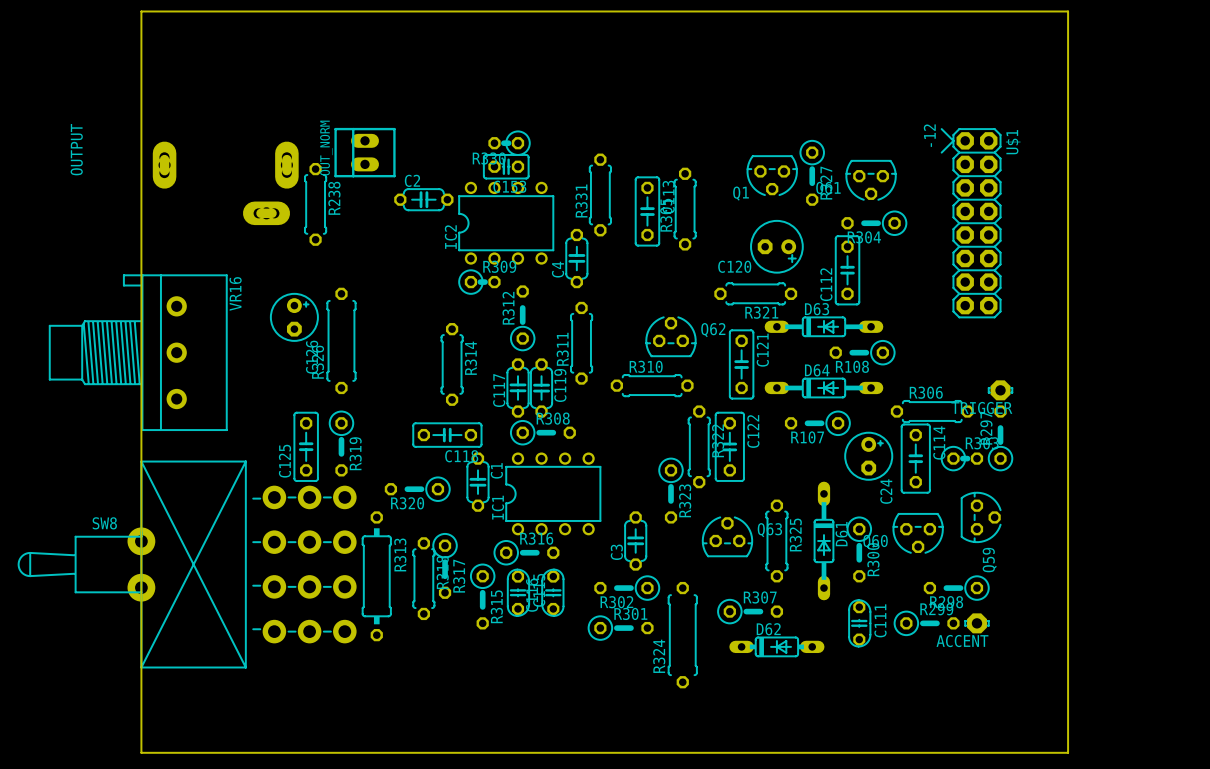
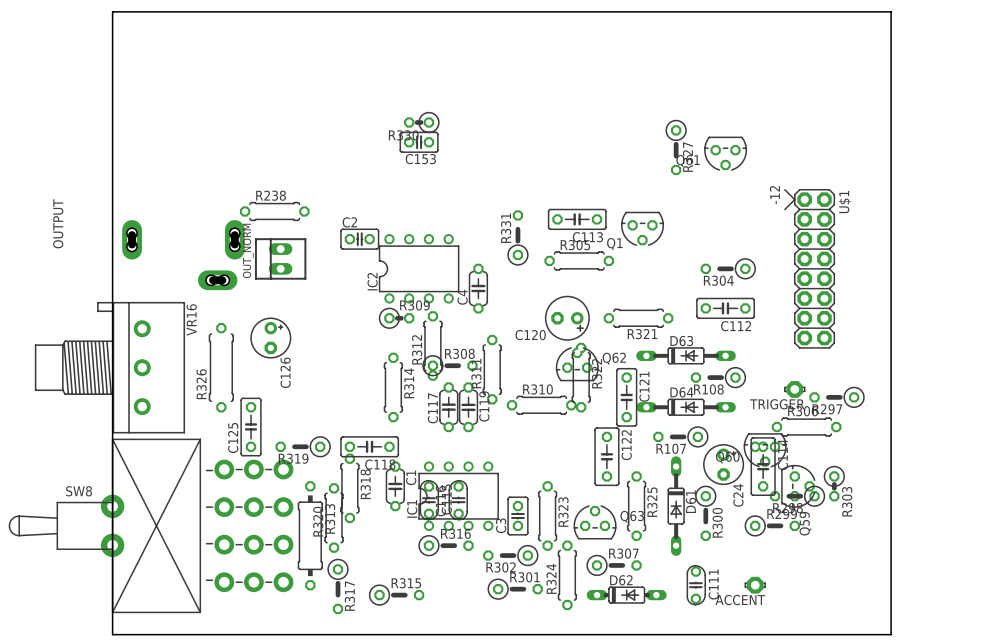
OUT_NORM position: (365, 152) -> (280, 258)
R331 footprint: [589, 153, 612, 237] -> [507, 210, 529, 266]
Q1 position: (772, 175) -> (642, 228)
OUTPUT position: (225, 183) -> (183, 255)
C2 footprint: [394, 188, 454, 211] -> [340, 228, 380, 250]
R238 name position: R238 (334, 198) -> R238 (271, 195)
R238 rotation: 0° (315, 204) -> 90° clockwise (274, 211)
R305 rotation: 0° (685, 209) -> 90° clockwise (579, 260)
R305 position: (685, 209) -> (579, 260)
C113 rotation: 0° (647, 211) -> 90° clockwise (577, 219)
C113 position: (647, 211) -> (577, 219)
IC2 position: (506, 223) -> (419, 268)
R304 position: (874, 223) -> (728, 268)
U$1 position: (971, 223) -> (809, 268)
C120 position: (776, 246) -> (567, 318)
C4 position: (576, 258) -> (478, 288)
C112 rotation: 0° (847, 270) -> 90° counterclockwise (725, 308)
C112 position: (847, 270) -> (725, 308)
R309 position: (479, 282) -> (396, 318)
R312 footprint: [510, 285, 535, 351] -> [423, 311, 443, 381]
R321 position: (755, 293) -> (638, 318)
C126 position: (294, 317) -> (270, 338)
D63 position: (823, 326) -> (686, 355)
Q62 position: (670, 336) -> (577, 364)
R326 position: (341, 340) -> (221, 367)
R311 position: (581, 343) -> (492, 369)
VR16 position: (138, 352) -> (109, 367)
R108 position: (862, 352) -> (718, 377)
R314 position: (452, 364) -> (393, 387)
C121 position: (741, 364) -> (626, 397)
R310 position: (652, 385) -> (541, 405)
C117 position: (518, 387) -> (448, 407)
C119 position: (541, 387) -> (468, 407)
D64 position: (823, 387) -> (686, 407)
TRIGGER position: (1000, 390) -> (794, 389)
R306 position: (932, 411) -> (806, 427)
R107 position: (817, 423) -> (680, 436)
C118 position: (447, 435) -> (369, 446)
R297 rotation: 0° (1000, 438) -> 90° counterclockwise (836, 397)
R319 rotation: 0° (341, 443) -> 90° clockwise (303, 446)
R319 position: (341, 443) -> (303, 446)
C125 position: (306, 446) -> (251, 427)
C122 position: (729, 446) -> (606, 456)
C24 position: (868, 456) -> (723, 464)
R323 footprint: [658, 458, 684, 524] -> [538, 481, 558, 551]
C114 position: (915, 458) -> (763, 466)
R303 rotation: 0° (962, 458) -> 90° clockwise (834, 483)
R303 position: (962, 458) -> (834, 483)
R320 footprint: [384, 476, 451, 502] -> [324, 483, 344, 553]
C1 position: (477, 482) -> (395, 486)
IC1 position: (553, 493) -> (458, 496)
C3 footprint: [624, 511, 647, 571] -> [507, 496, 529, 536]
Q59 position: (981, 517) -> (798, 486)
Q63 position: (727, 536) -> (595, 522)
R325 position: (776, 540) -> (636, 506)
D61 position: (823, 540) -> (676, 506)
R300 position: (859, 549) -> (705, 513)
R316 position: (526, 552) -> (446, 545)
SW8 position: (187, 564) -> (151, 525)
R317 position: (445, 566) -> (338, 586)
R313 position: (376, 576) -> (310, 535)
R324 footprint: [667, 581, 698, 689] -> [557, 540, 577, 611]
R302 position: (626, 588) -> (510, 555)
R315 rotation: 0° (482, 596) -> 90° counterclockwise (396, 595)
R315 position: (482, 596) -> (396, 595)
R307 position: (750, 611) -> (614, 565)
C111 position: (859, 623) -> (696, 585)
ACCENT position: (976, 623) -> (755, 585)
R301 position: (620, 628) -> (515, 589)
D62 position: (776, 646) -> (626, 595)

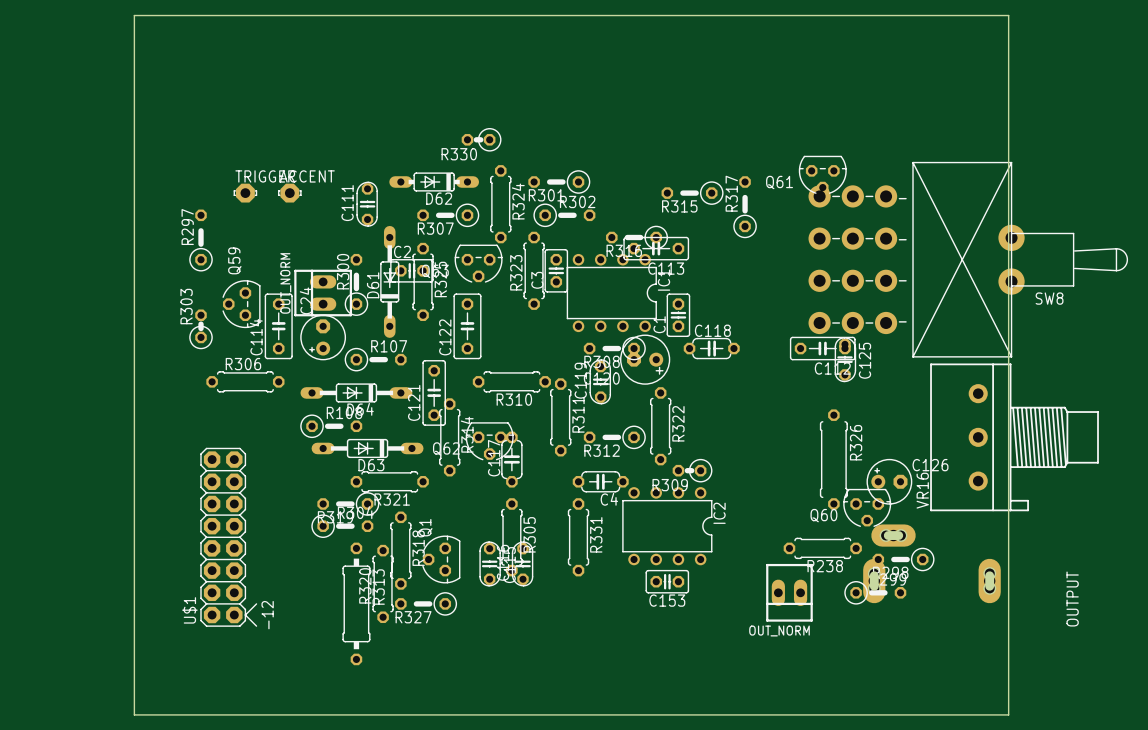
C153 position: (419, 142) -> (667, 581)
R327 rotation: 0° (676, 147) -> 90° clockwise (425, 603)
R327 position: (676, 147) -> (425, 603)
TRIGGER: none -> (245, 193)
ACCENT: none -> (289, 193)
U$1 footprint: [784, 189, 835, 349] -> [200, 447, 258, 627]
R238 name position: R238 (271, 195) -> R238 (825, 566)
U$1 name position: U$1 (845, 202) -> U$1 (189, 610)
R331 footprint: [507, 210, 529, 266] -> [567, 498, 590, 577]
R238 position: (274, 211) -> (822, 548)
R331 name position: R331 (506, 228) -> R331 (596, 534)
Q1 rotation: 0° (642, 228) -> 90° clockwise (441, 559)
Q1 position: (642, 228) -> (441, 559)
OUTPUT: (183, 255) -> none
R305 rotation: 0° (579, 260) -> 90° clockwise (511, 537)
R305 position: (579, 260) -> (511, 537)
IC2 rotation: 0° (419, 268) -> 180° (667, 526)
IC2 position: (419, 268) -> (667, 526)
R304 rotation: 0° (728, 268) -> 180° (342, 526)
R304 position: (728, 268) -> (342, 526)
C4 rotation: 0° (478, 288) -> 90° counterclockwise (600, 481)
C4 position: (478, 288) -> (600, 481)
R312 footprint: [423, 311, 443, 381] -> [583, 425, 646, 449]
R309 rotation: 0° (396, 318) -> 180° (692, 470)
R309 position: (396, 318) -> (692, 470)
R321 position: (638, 318) -> (389, 481)
C126 rotation: 0° (270, 338) -> 90° counterclockwise (889, 481)
C126 position: (270, 338) -> (889, 481)
D63 rotation: 0° (686, 355) -> 180° (367, 448)
D63 position: (686, 355) -> (367, 448)
Q62 rotation: 0° (577, 364) -> 180° (489, 441)
Q62 position: (577, 364) -> (489, 441)
R308 rotation: 0° (450, 365) -> 180° (614, 348)
R308 position: (450, 365) -> (614, 348)
VR16 rotation: 0° (109, 367) -> 180° (1014, 437)
VR16 position: (109, 367) -> (1014, 437)
R326 position: (221, 367) -> (833, 459)
R311 name position: R311 (476, 373) -> R311 (578, 414)
R108 rotation: 0° (718, 377) -> 180° (331, 426)
R108 position: (718, 377) -> (331, 426)
C119 footprint: [459, 382, 479, 433] -> [589, 359, 611, 405]
R326 name position: R326 (201, 384) -> R326 (856, 442)
R310 name position: R310 (537, 389) -> R310 (514, 399)
TRIGGER: (794, 389) -> none
C125 footprint: [240, 397, 262, 457] -> [834, 337, 857, 383]
C121 rotation: 0° (626, 397) -> 180° (434, 392)
C121 position: (626, 397) -> (434, 392)
R297 rotation: 0° (836, 397) -> 90° clockwise (201, 240)
R297 position: (836, 397) -> (201, 240)
R310 position: (541, 405) -> (511, 381)
C119 name position: C119 (484, 406) -> C119 (580, 380)
D64 rotation: 0° (686, 407) -> 180° (356, 392)
D64 position: (686, 407) -> (356, 392)
R306 position: (806, 427) -> (245, 381)
C118 footprint: [340, 436, 399, 458] -> [683, 337, 740, 360]
R107 rotation: 0° (680, 436) -> 180° (375, 359)
R107 position: (680, 436) -> (375, 359)
C125 name position: C125 (233, 438) -> C125 (864, 360)
C122 rotation: 0° (606, 456) -> 180° (467, 326)
C122 position: (606, 456) -> (467, 326)
C1 footprint: [385, 461, 405, 512] -> [666, 293, 691, 337]
C118 name position: C118 (380, 464) -> C118 (712, 330)
C24 rotation: 0° (723, 464) -> 180° (323, 337)
C24 position: (723, 464) -> (323, 337)
C114 rotation: 0° (763, 466) -> 180° (278, 326)
C114 position: (763, 466) -> (278, 326)
C1 name position: C1 (411, 477) -> C1 (659, 324)
R303 rotation: 0° (834, 483) -> 180° (201, 329)
R303 position: (834, 483) -> (201, 329)
Q59 rotation: 0° (798, 486) -> 180° (241, 304)
Q59 position: (798, 486) -> (241, 304)
IC1 rotation: 0° (458, 496) -> 180° (611, 293)
IC1 position: (458, 496) -> (611, 293)
OUTPUT: none -> (931, 563)
R325 position: (636, 506) -> (423, 281)
D61 rotation: 0° (676, 506) -> 180° (389, 281)
D61 position: (676, 506) -> (389, 281)
R323 name position: R323 (563, 512) -> R323 (516, 272)
R300 rotation: 0° (705, 513) -> 180° (356, 284)
R300 position: (705, 513) -> (356, 284)
C3 position: (517, 516) -> (556, 270)
R323 position: (547, 516) -> (534, 270)
Q63 rotation: 0° (595, 522) -> 180° (478, 263)
Q63 position: (595, 522) -> (478, 263)
SW8 rotation: 0° (151, 525) -> 180° (968, 259)
SW8 position: (151, 525) -> (968, 259)
OUT_NORM: none -> (789, 592)
R316 rotation: 0° (446, 545) -> 180° (636, 237)
R316 position: (446, 545) -> (636, 237)
R302 rotation: 0° (510, 555) -> 180° (564, 215)
R302 position: (510, 555) -> (564, 215)
R307 rotation: 0° (614, 565) -> 180° (448, 215)
R307 position: (614, 565) -> (448, 215)
R324 position: (567, 575) -> (500, 204)
R324 name position: R324 (551, 578) -> R324 (518, 201)
C111 rotation: 0° (696, 585) -> 180° (367, 204)
C111 position: (696, 585) -> (367, 204)
ACCENT: (755, 585) -> none
R317 rotation: 0° (338, 586) -> 180° (745, 207)
R317 position: (338, 586) -> (745, 207)
R301 rotation: 0° (515, 589) -> 180° (559, 181)
R301 position: (515, 589) -> (559, 181)
R315 rotation: 0° (396, 595) -> 180° (692, 193)
R315 position: (396, 595) -> (692, 193)
D62 rotation: 0° (626, 595) -> 180° (434, 181)
D62 position: (626, 595) -> (434, 181)

